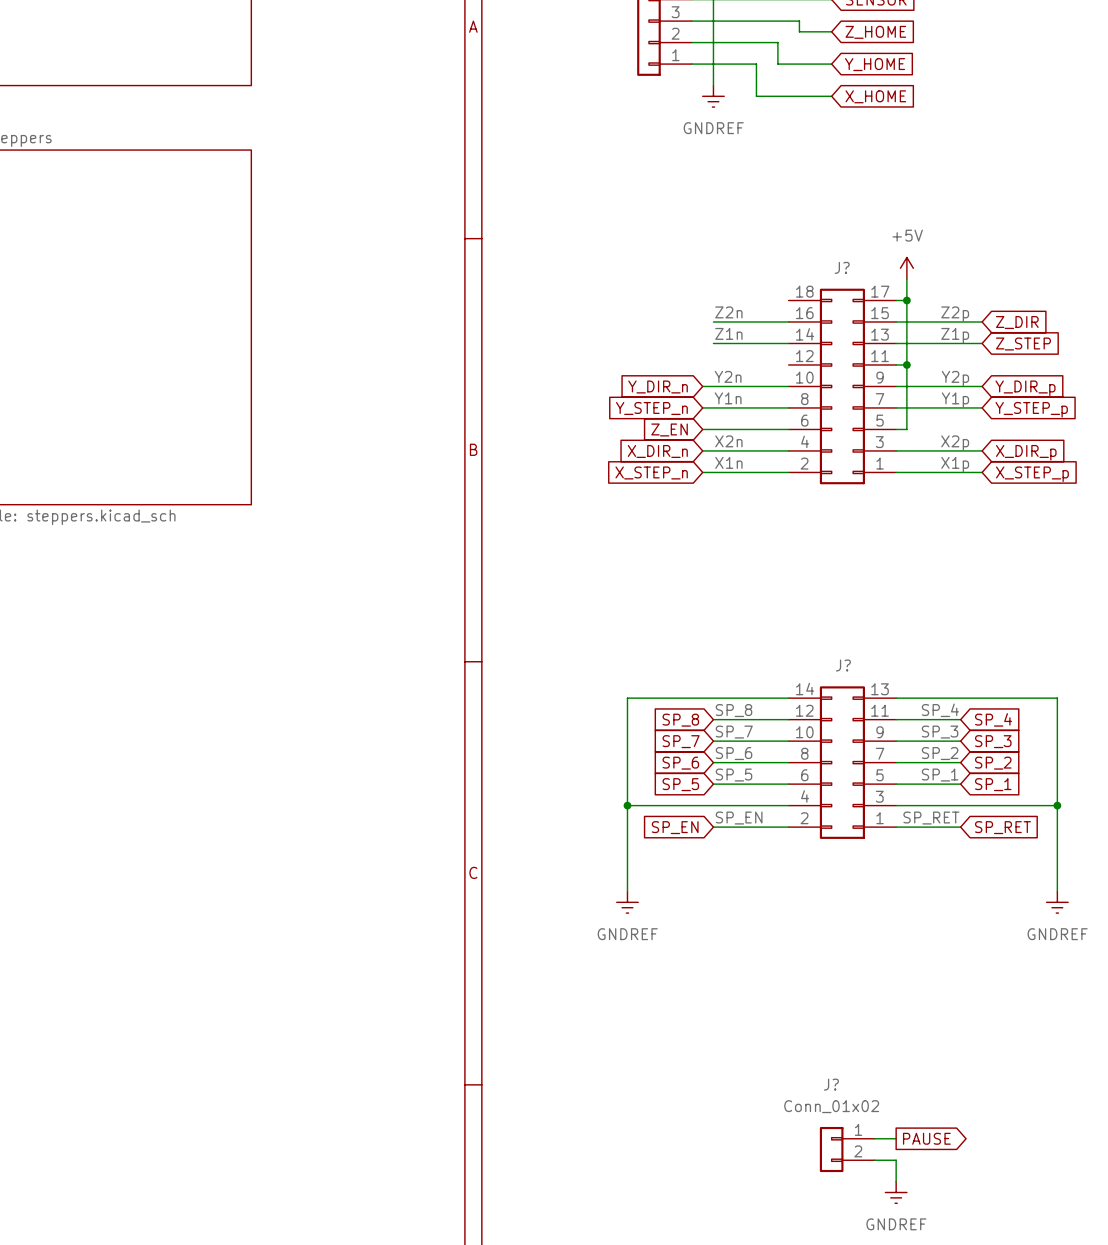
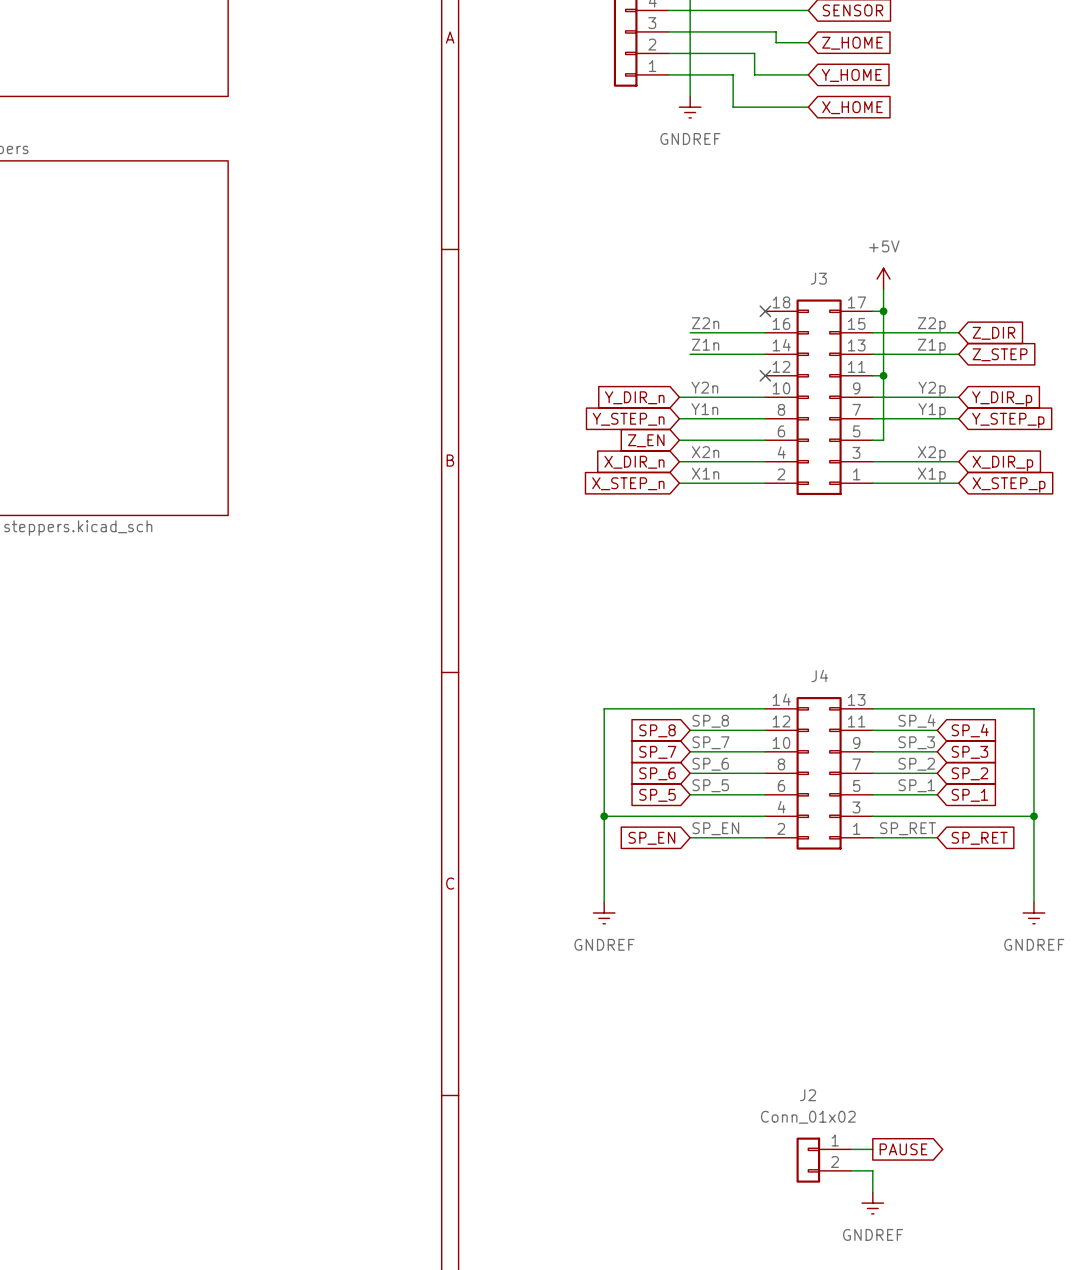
J? name: J? (842, 267) -> J3 (818, 278)
no-connect mark: none -> (765, 311)
no-connect mark: none -> (765, 375)
J? name: J? (843, 665) -> J4 (819, 675)
J? name: J? (831, 1084) -> J2 (808, 1095)

